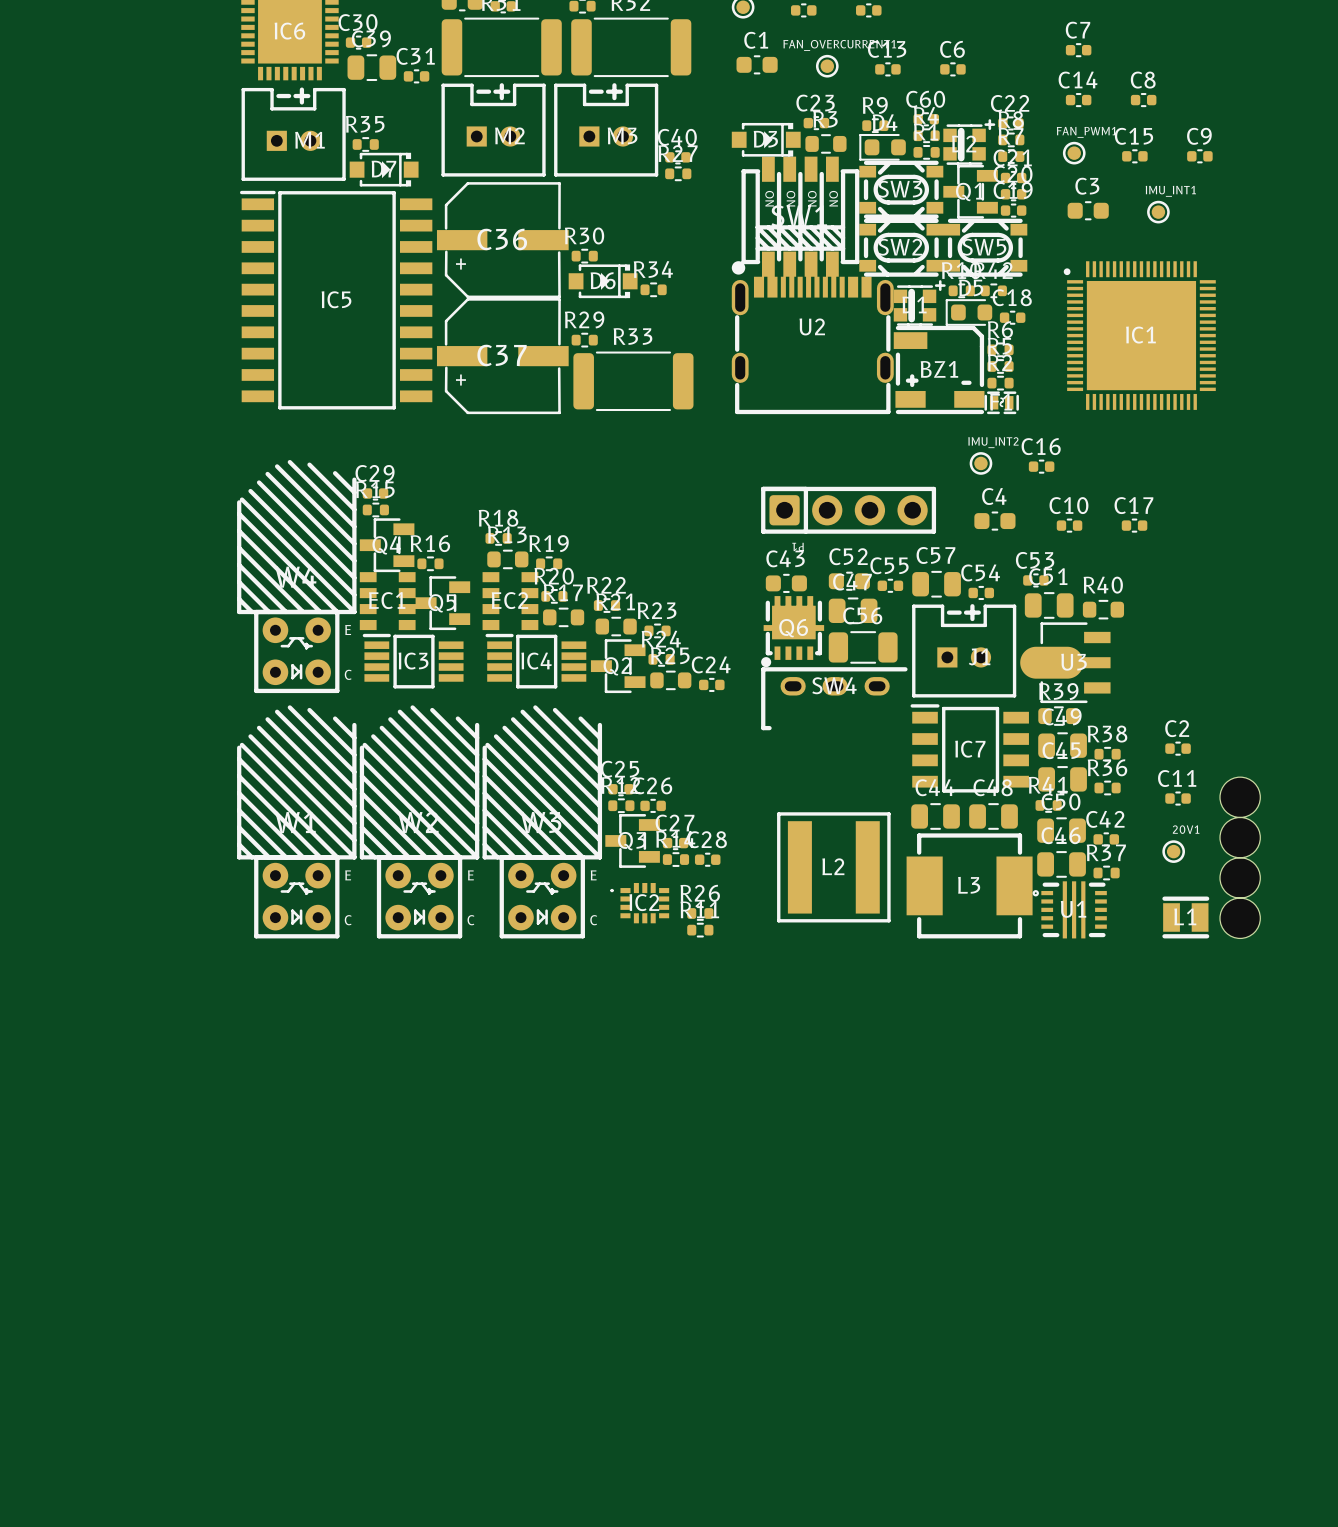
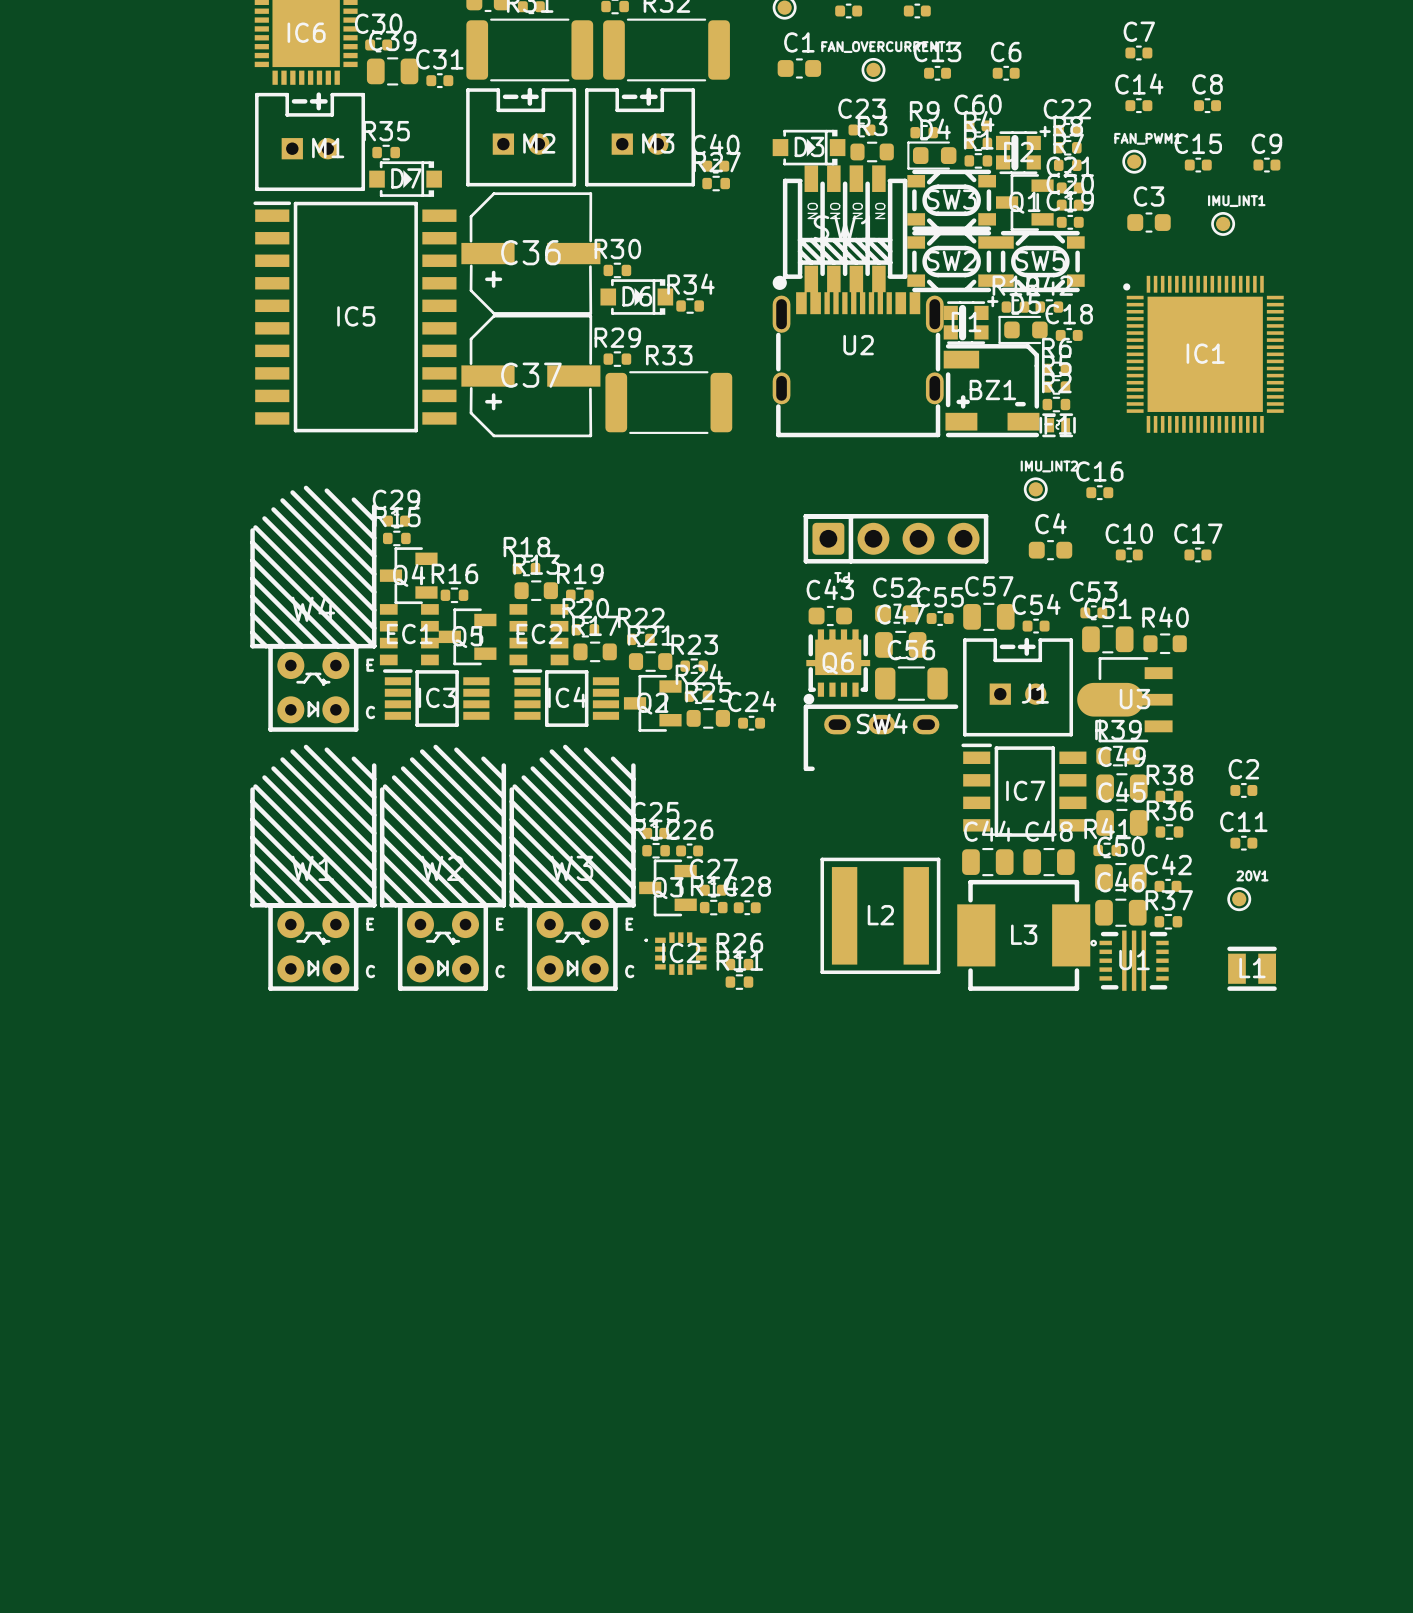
part: (1240, 797) -> none
part: (1240, 837) -> none
part: (1240, 877) -> none
part: (1240, 918) -> none

